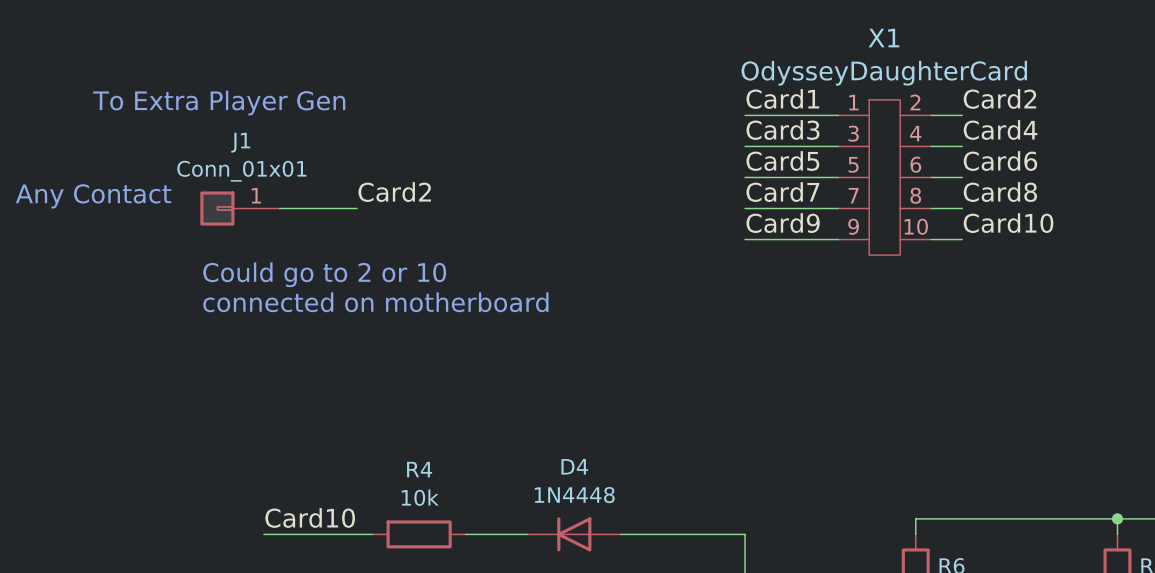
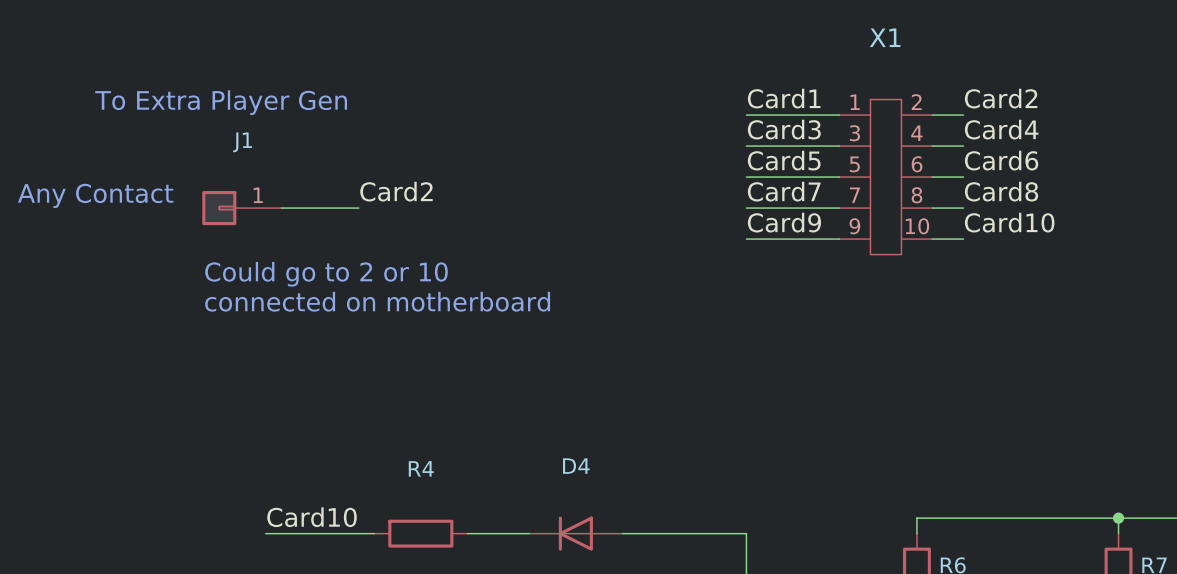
X1 value: OdysseyDaughterCard (884, 73) -> none
J1 value: Conn_01x01 (241, 171) -> none
D4 value: 1N4448 (574, 495) -> none
R4 value: 10k (420, 497) -> none

